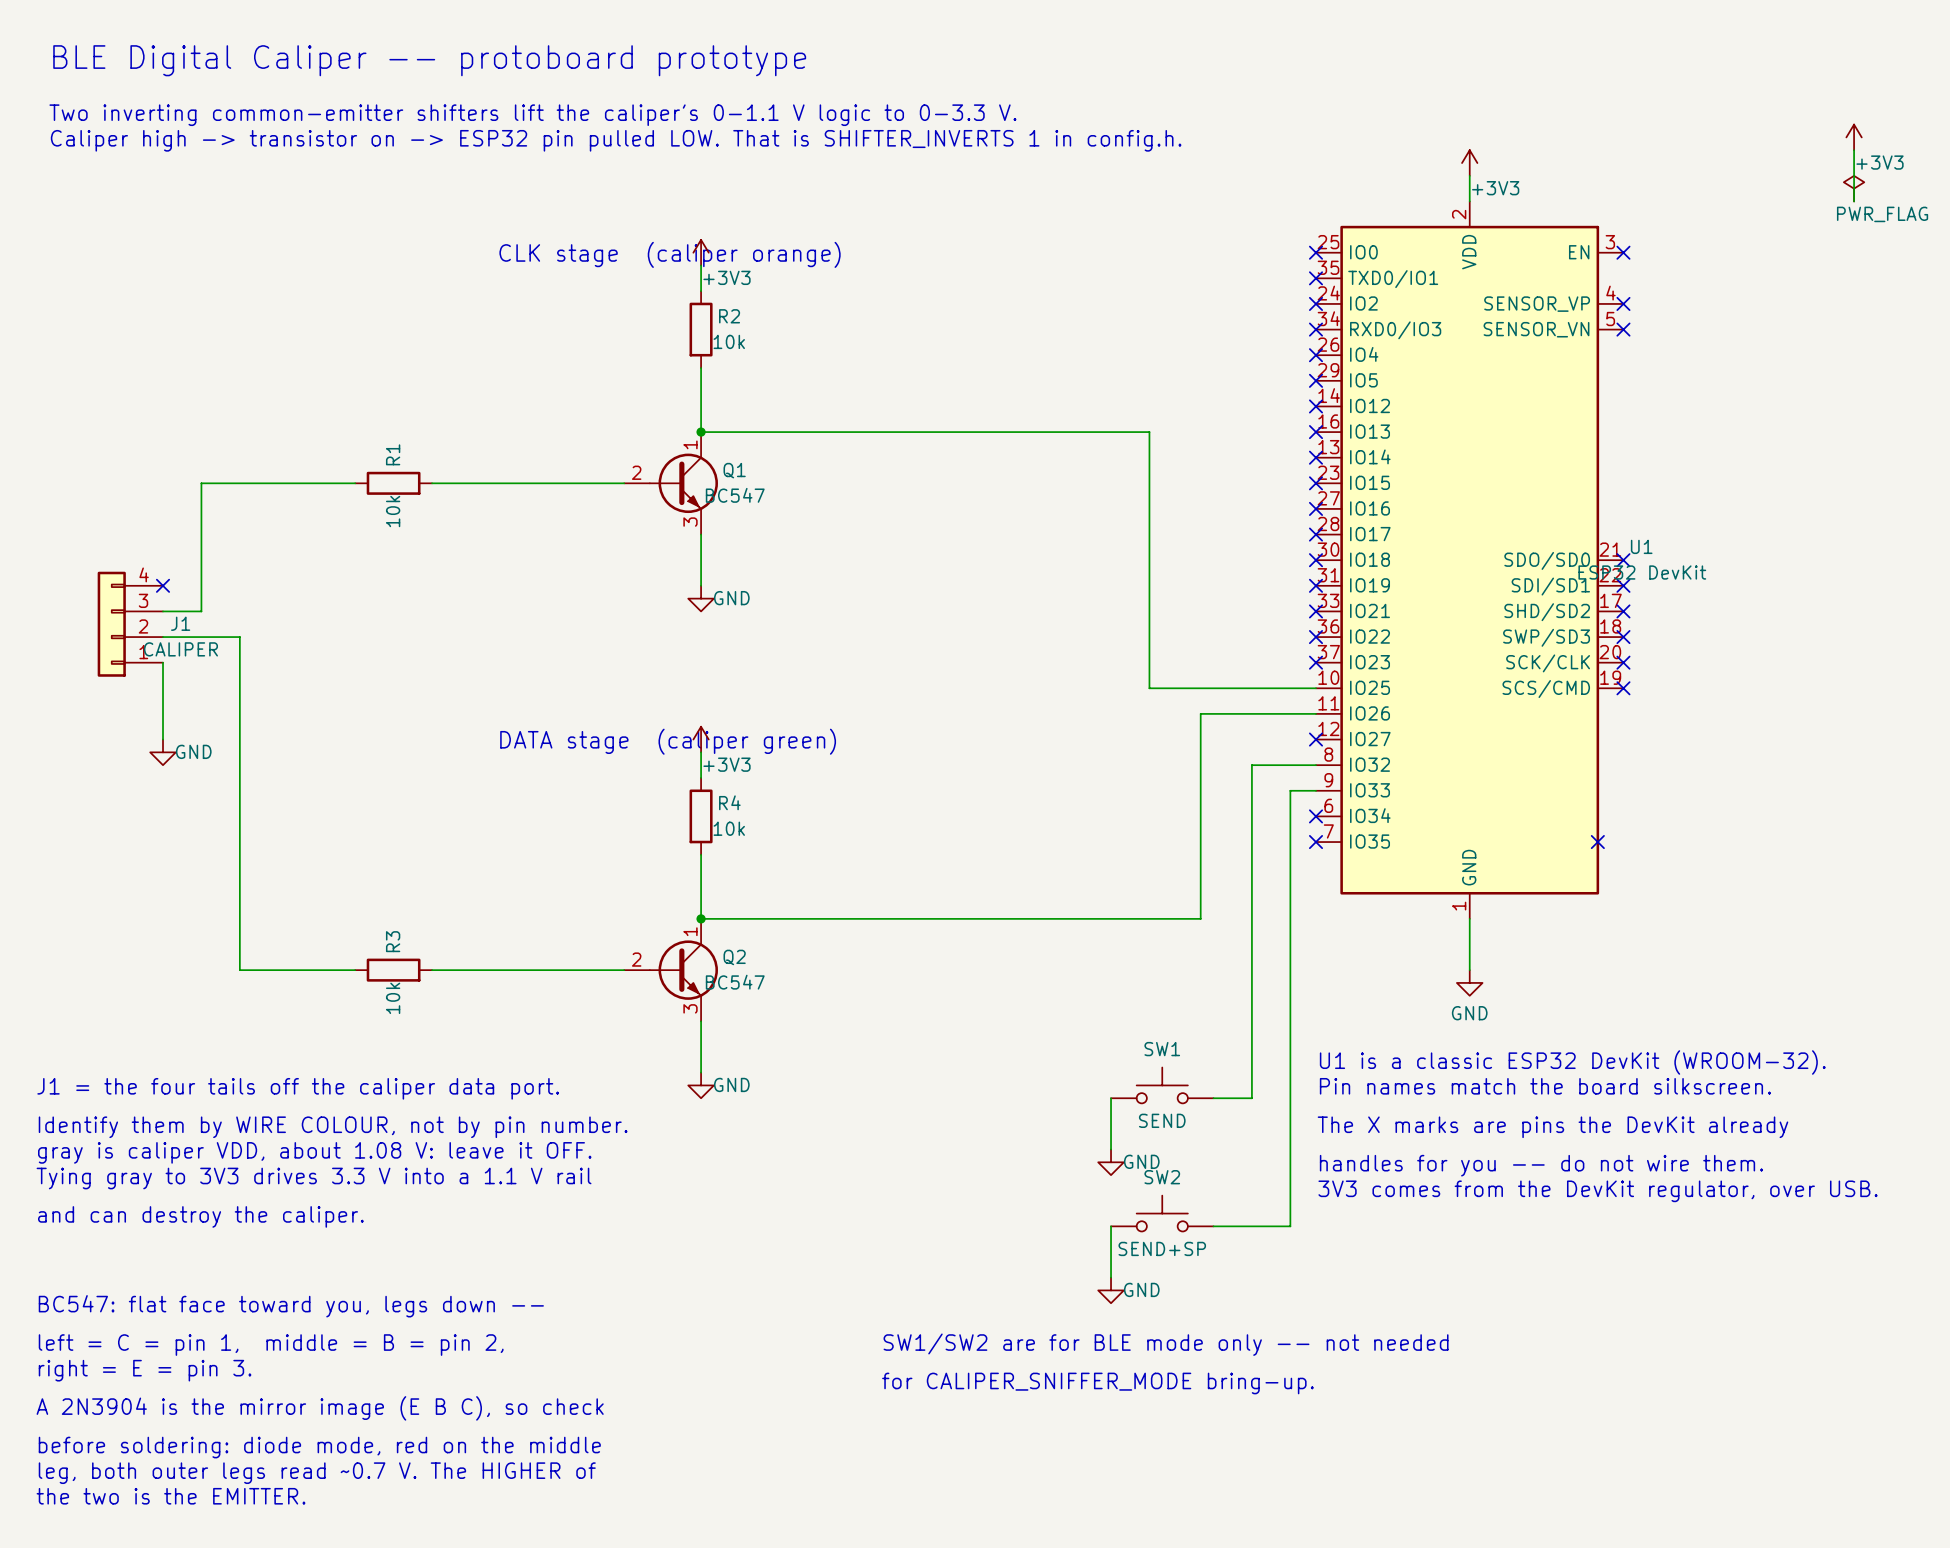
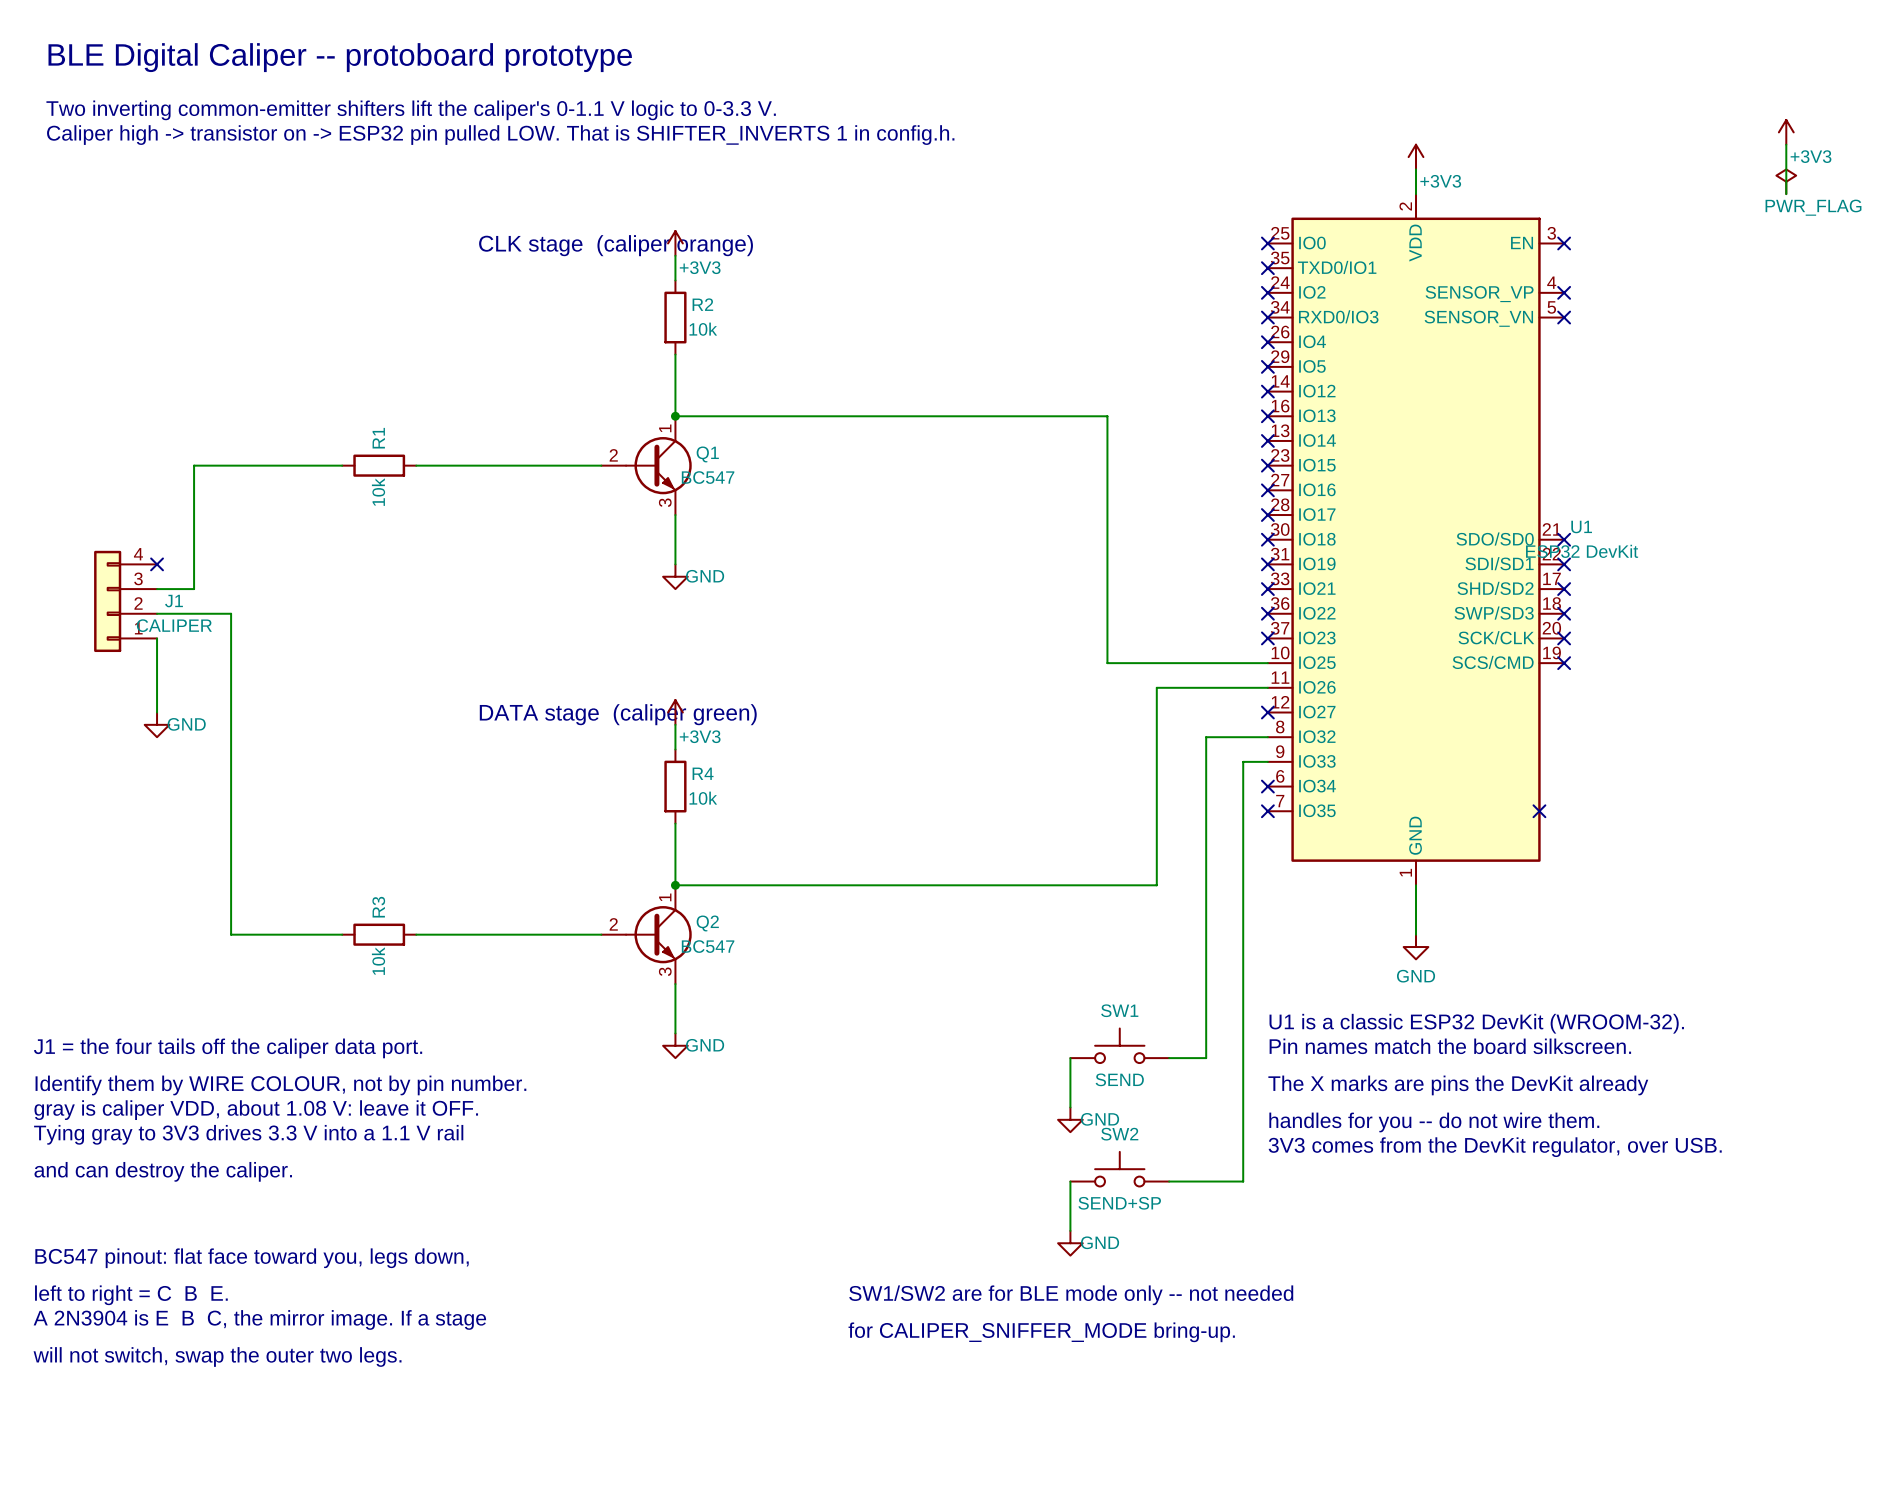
text: BC547: flat face toward you, legs down -- (291, 1306) -> BC547 pinout: flat face toward you, legs down, (252, 1258)
text: left = C = pin 1, middle = B = pin 2, (271, 1345) -> left to right = C B E. (131, 1295)
text: right = E = pin 3. (145, 1370) -> A 2N3904 is E B C, the mirror image. If a stage (259, 1319)
text: A 2N3904 is the mirror image (E B C), so check (320, 1408) -> will not switch, swap the outer two legs. (217, 1356)
text: before soldering: diode mode, red on the middle (319, 1447) -> none
text: leg, both outer legs read ~0.7 V. The HIGHER of (317, 1473) -> none
text: the two is the EMITTER. (171, 1496) -> none

